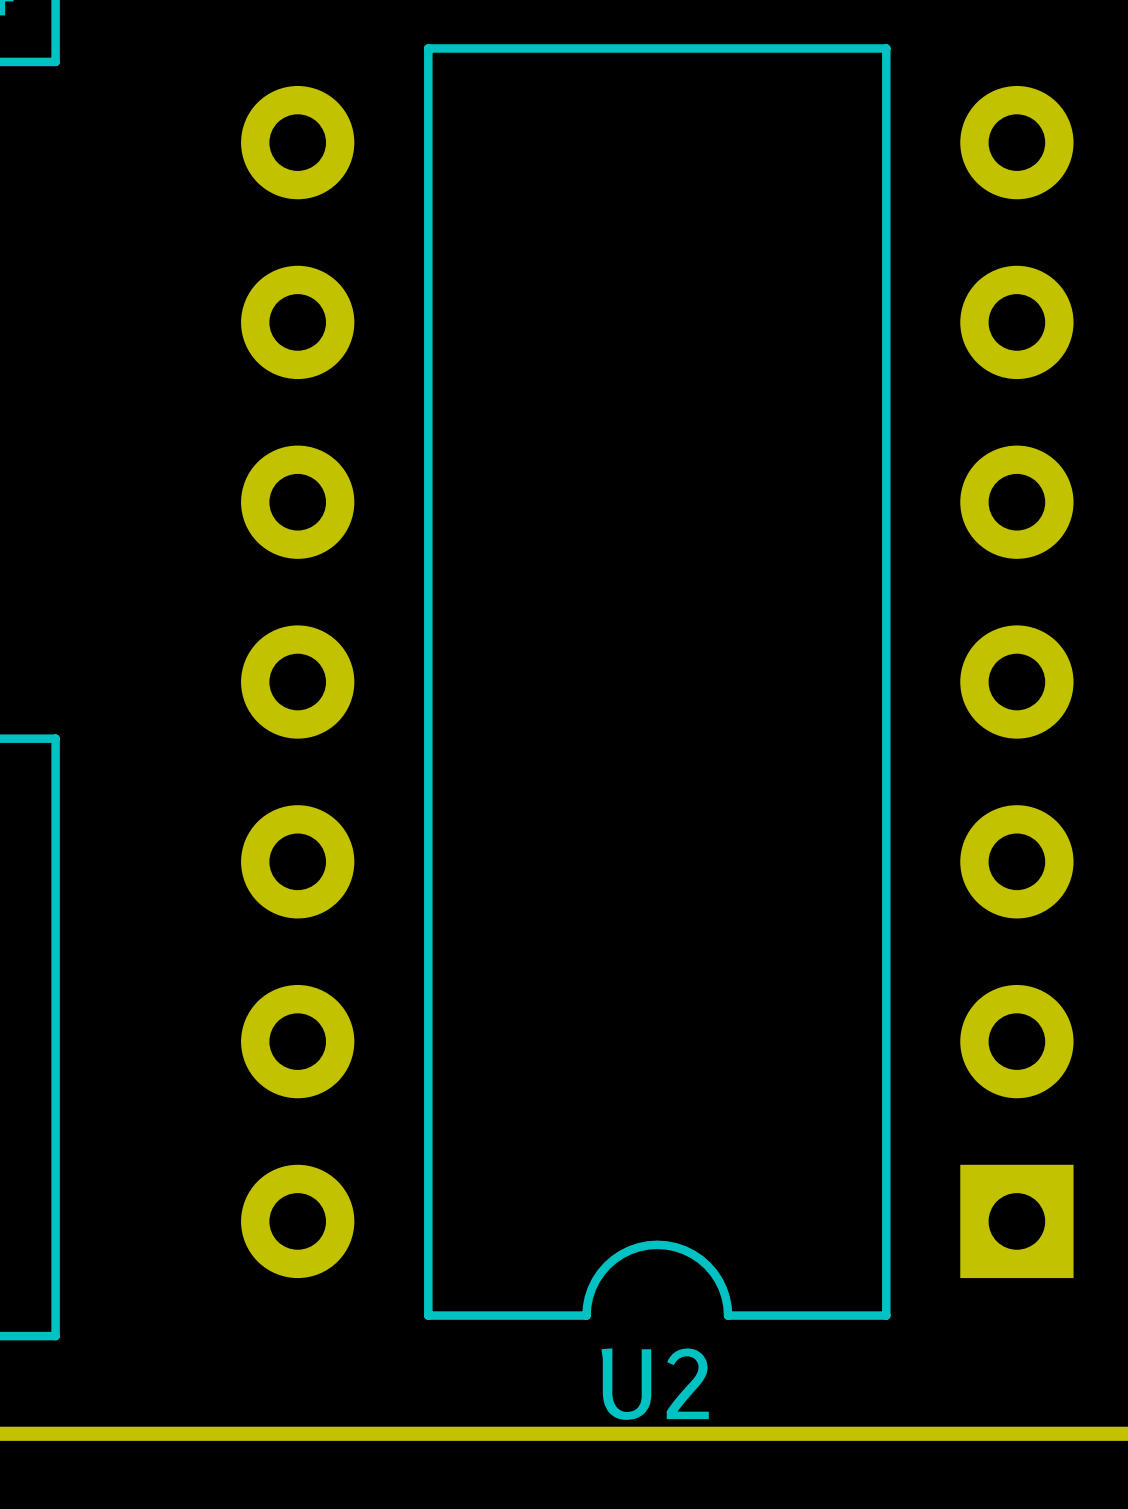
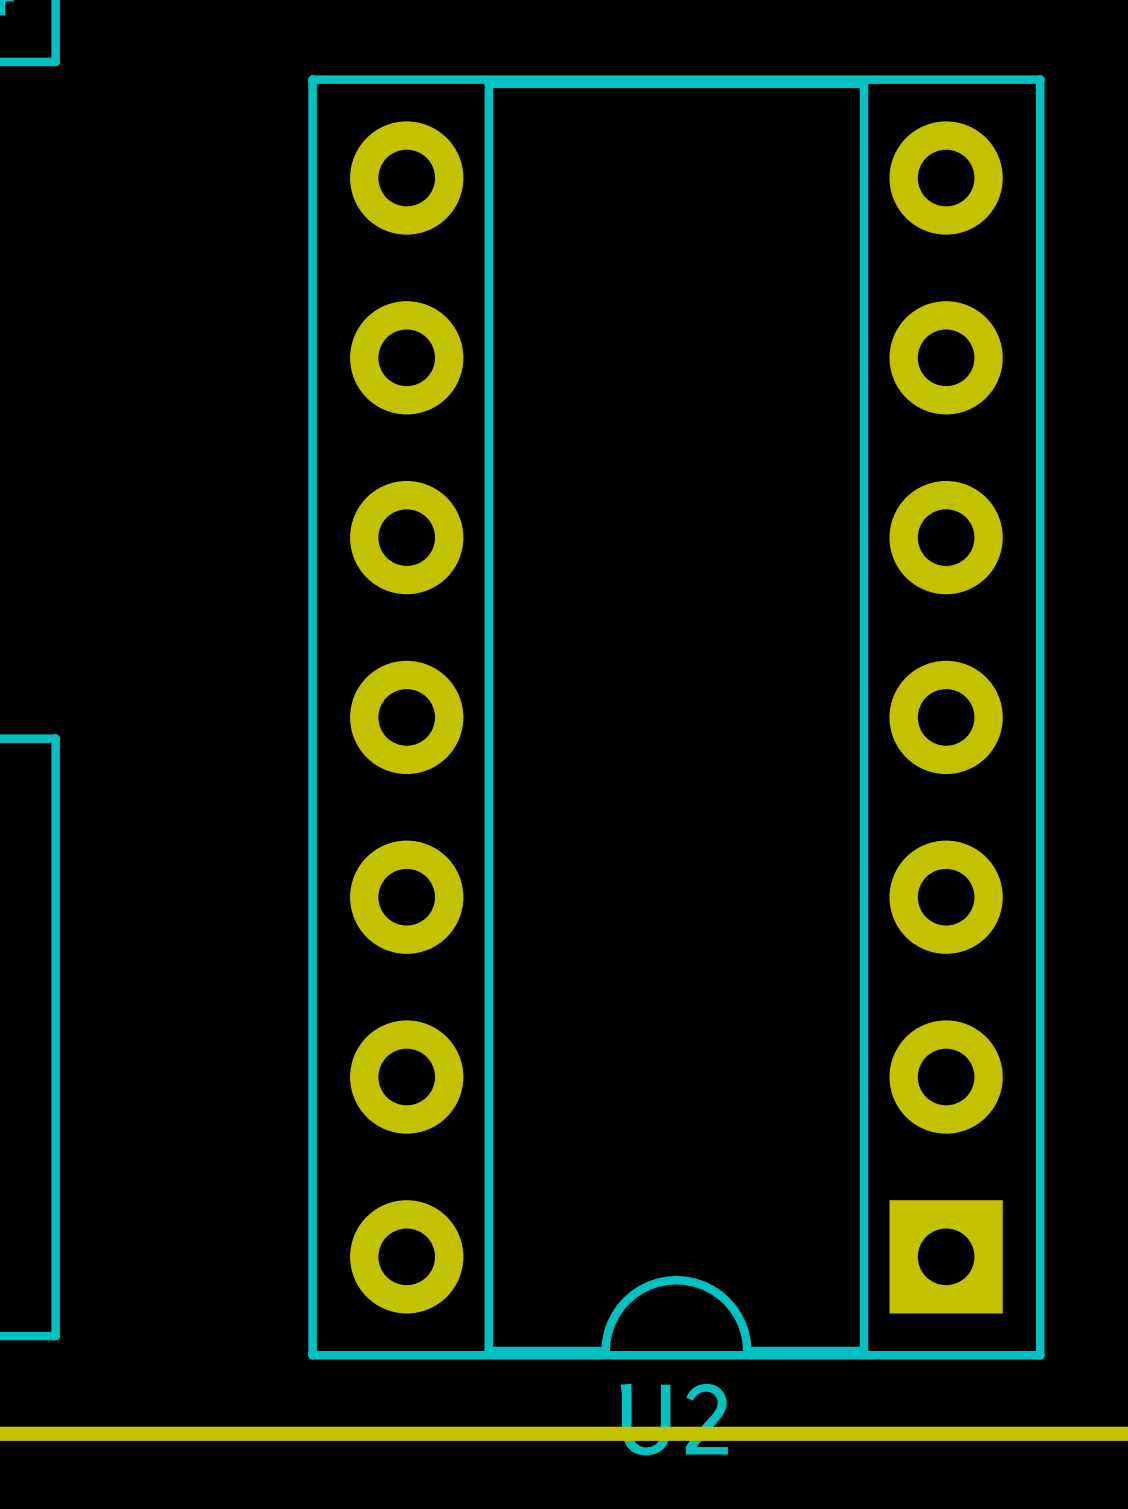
U2 footprint: [241, 44, 1074, 1320] -> [308, 75, 1045, 1360]

